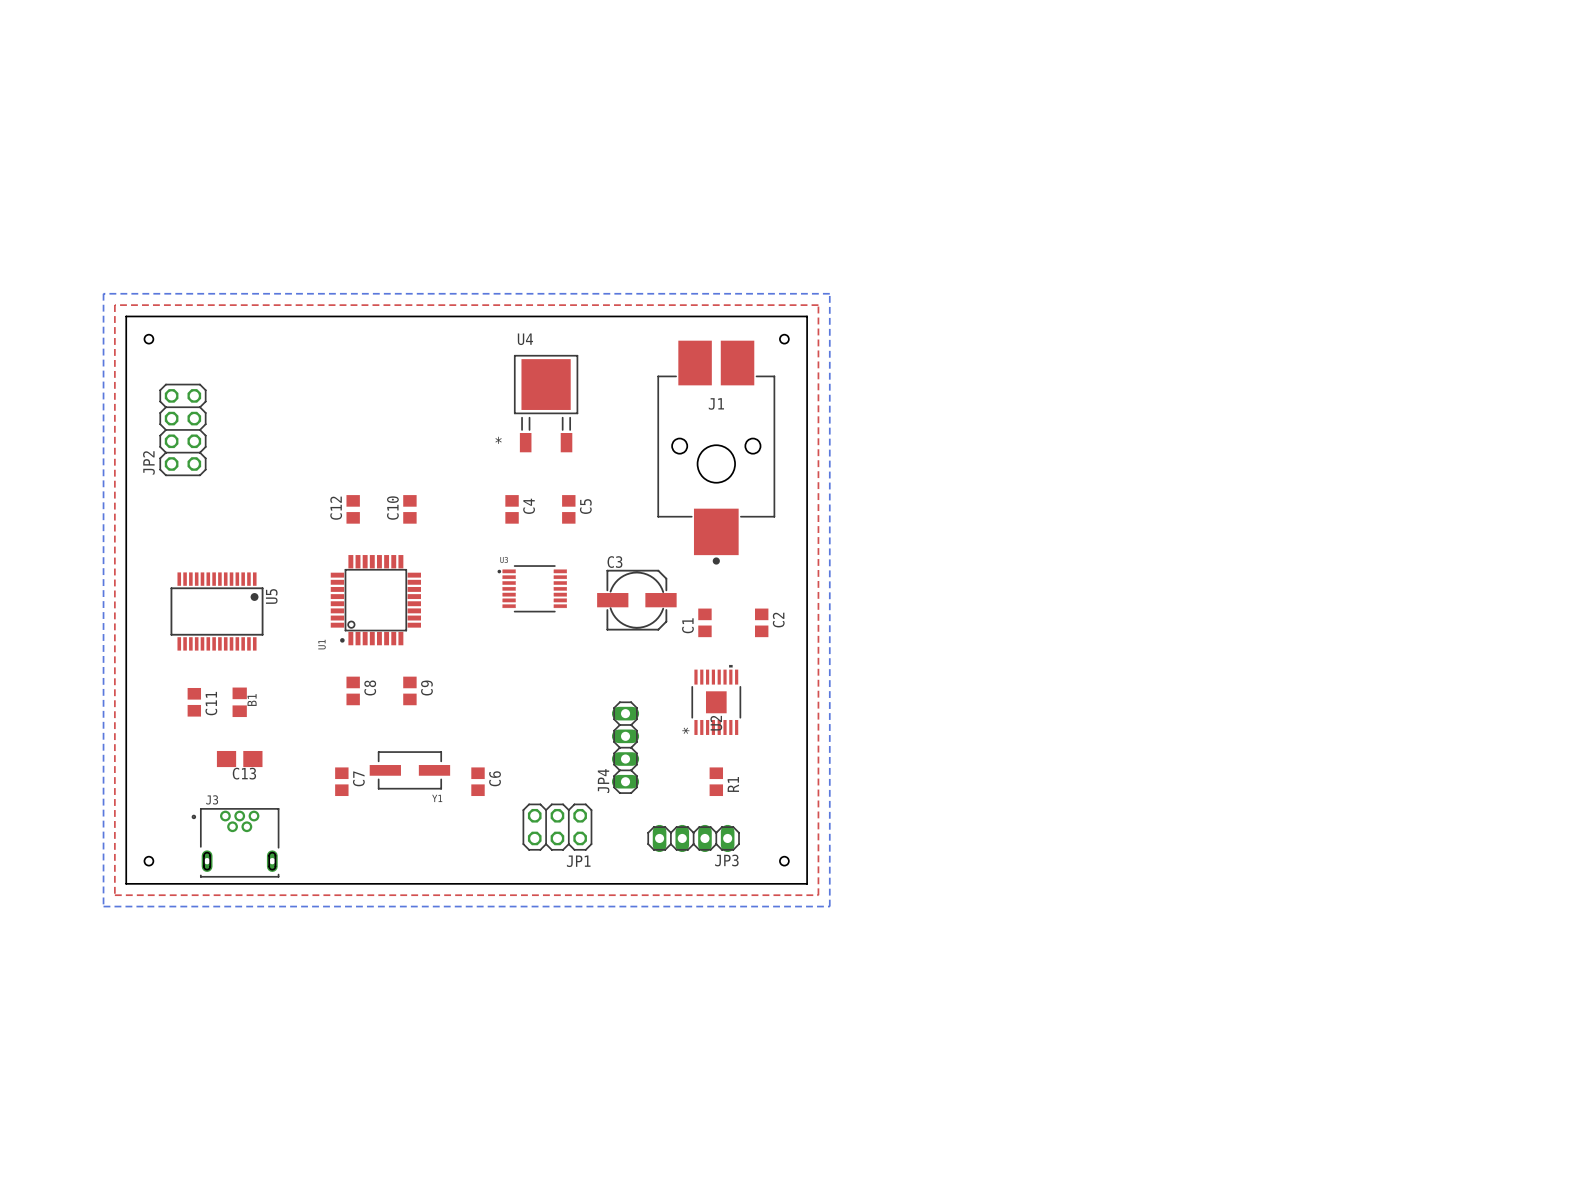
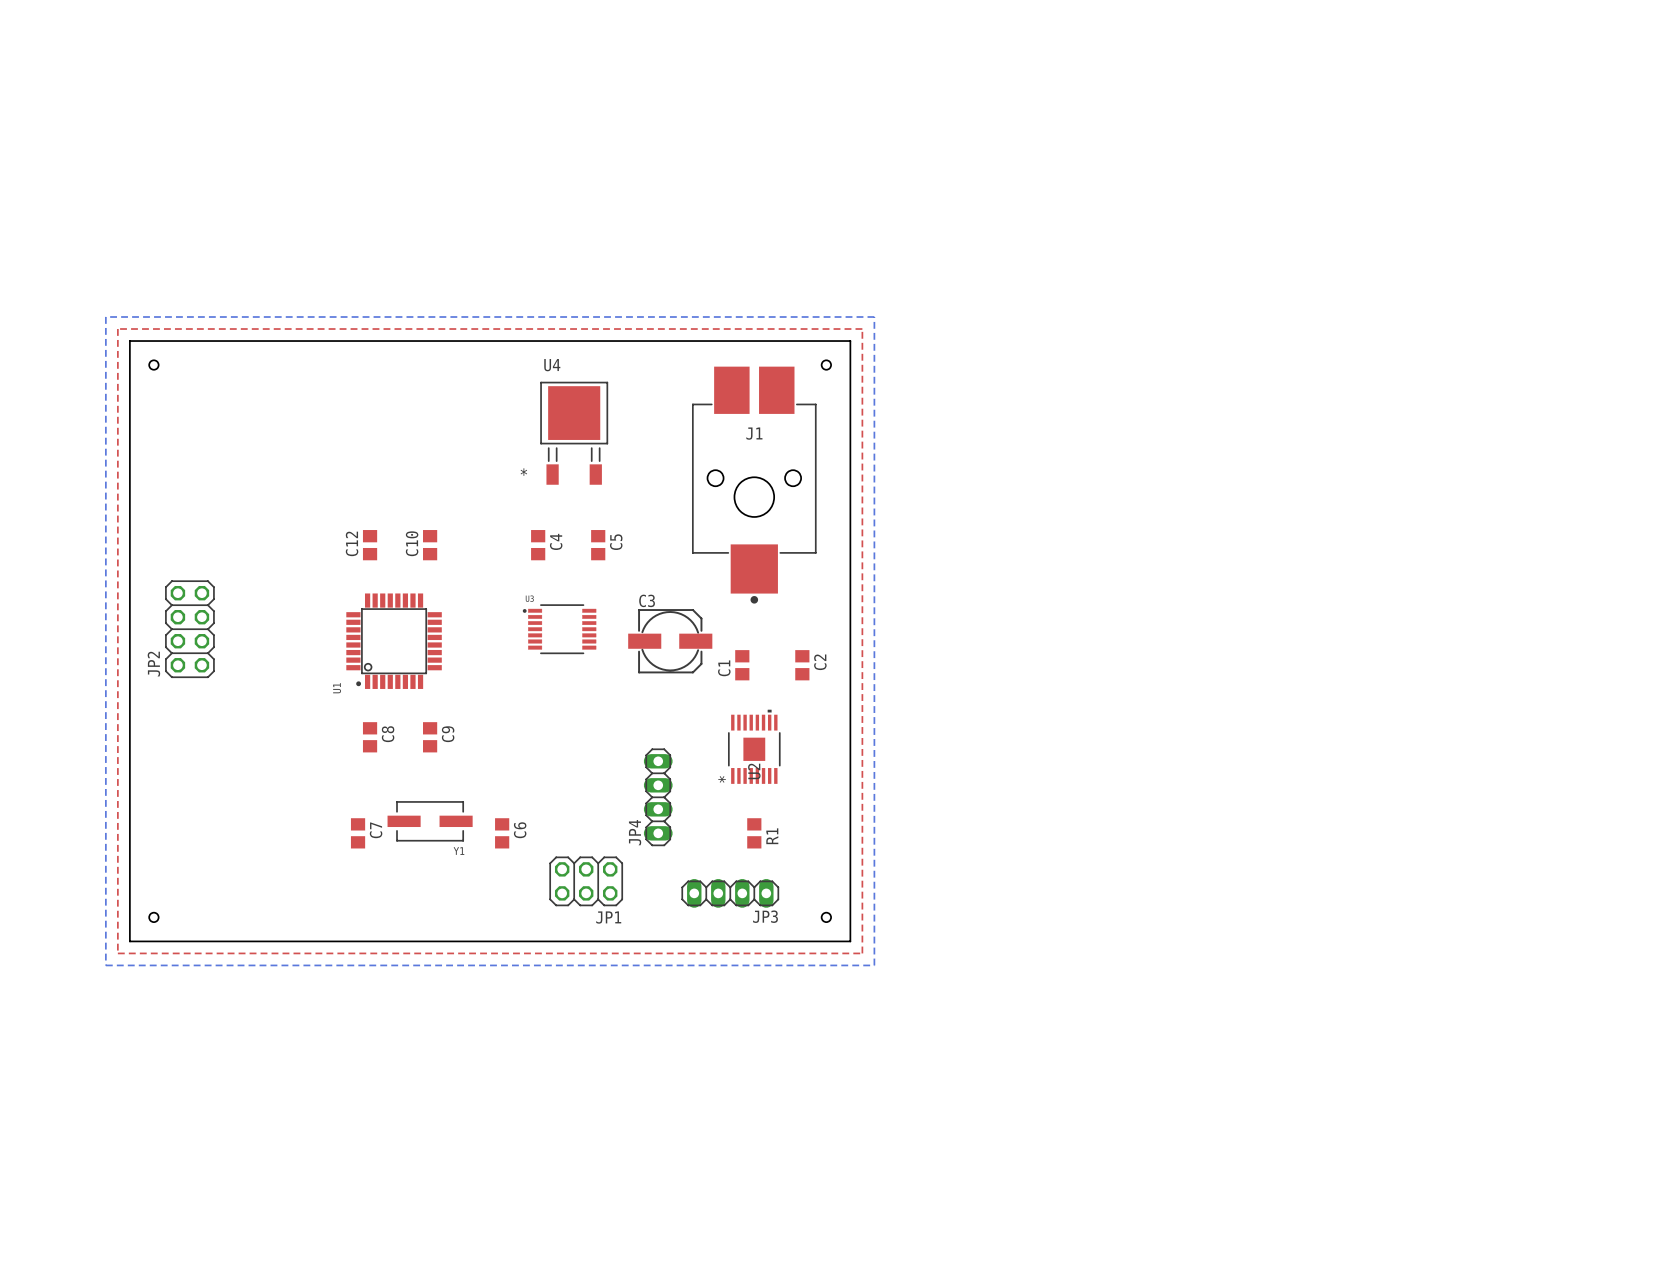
JP2 position: (182, 429) -> (189, 629)
U5: (217, 611) -> none
C11: (194, 702) -> none
B1: (239, 702) -> none
C13: (239, 759) -> none
J3: (235, 842) -> none

